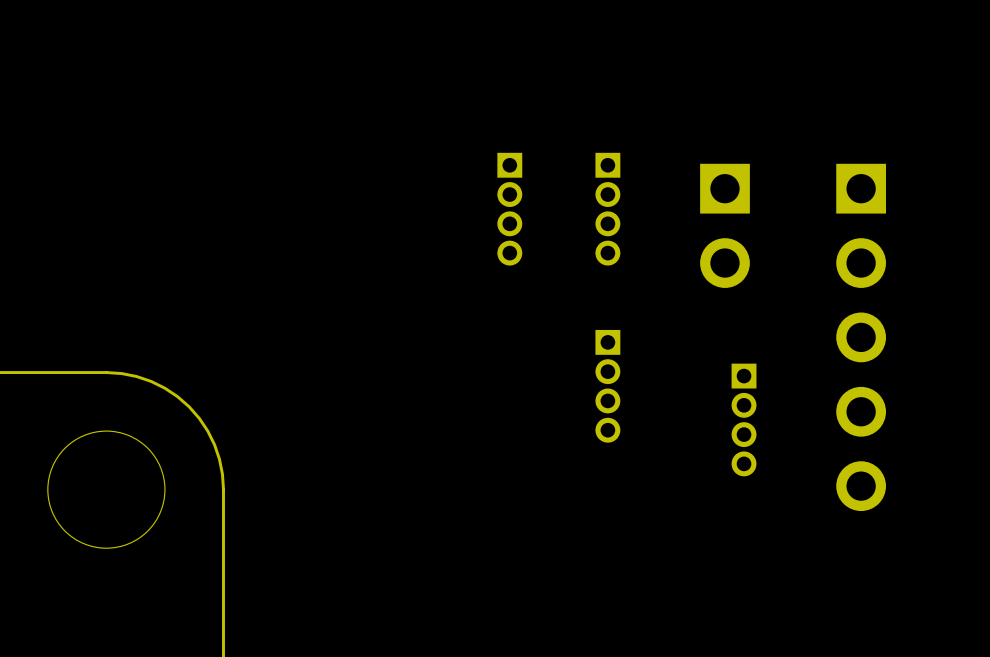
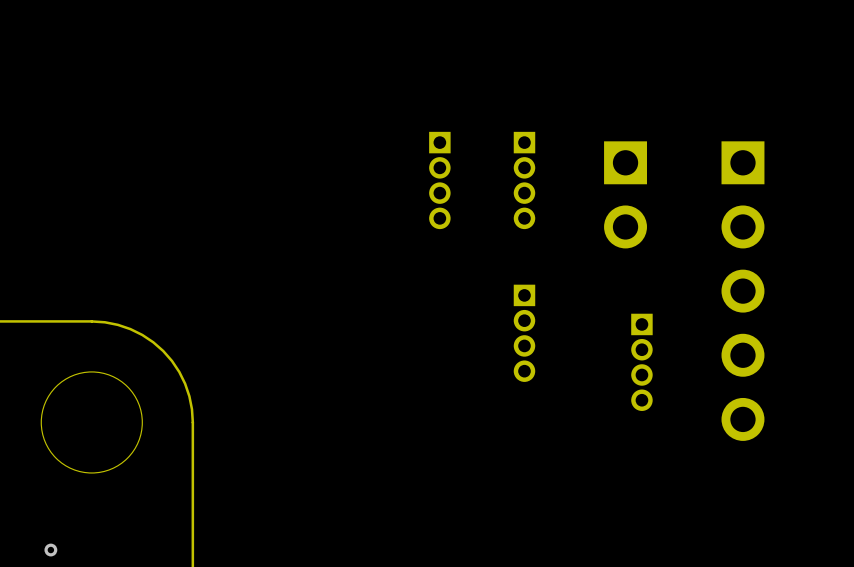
via: none -> (50, 550)

